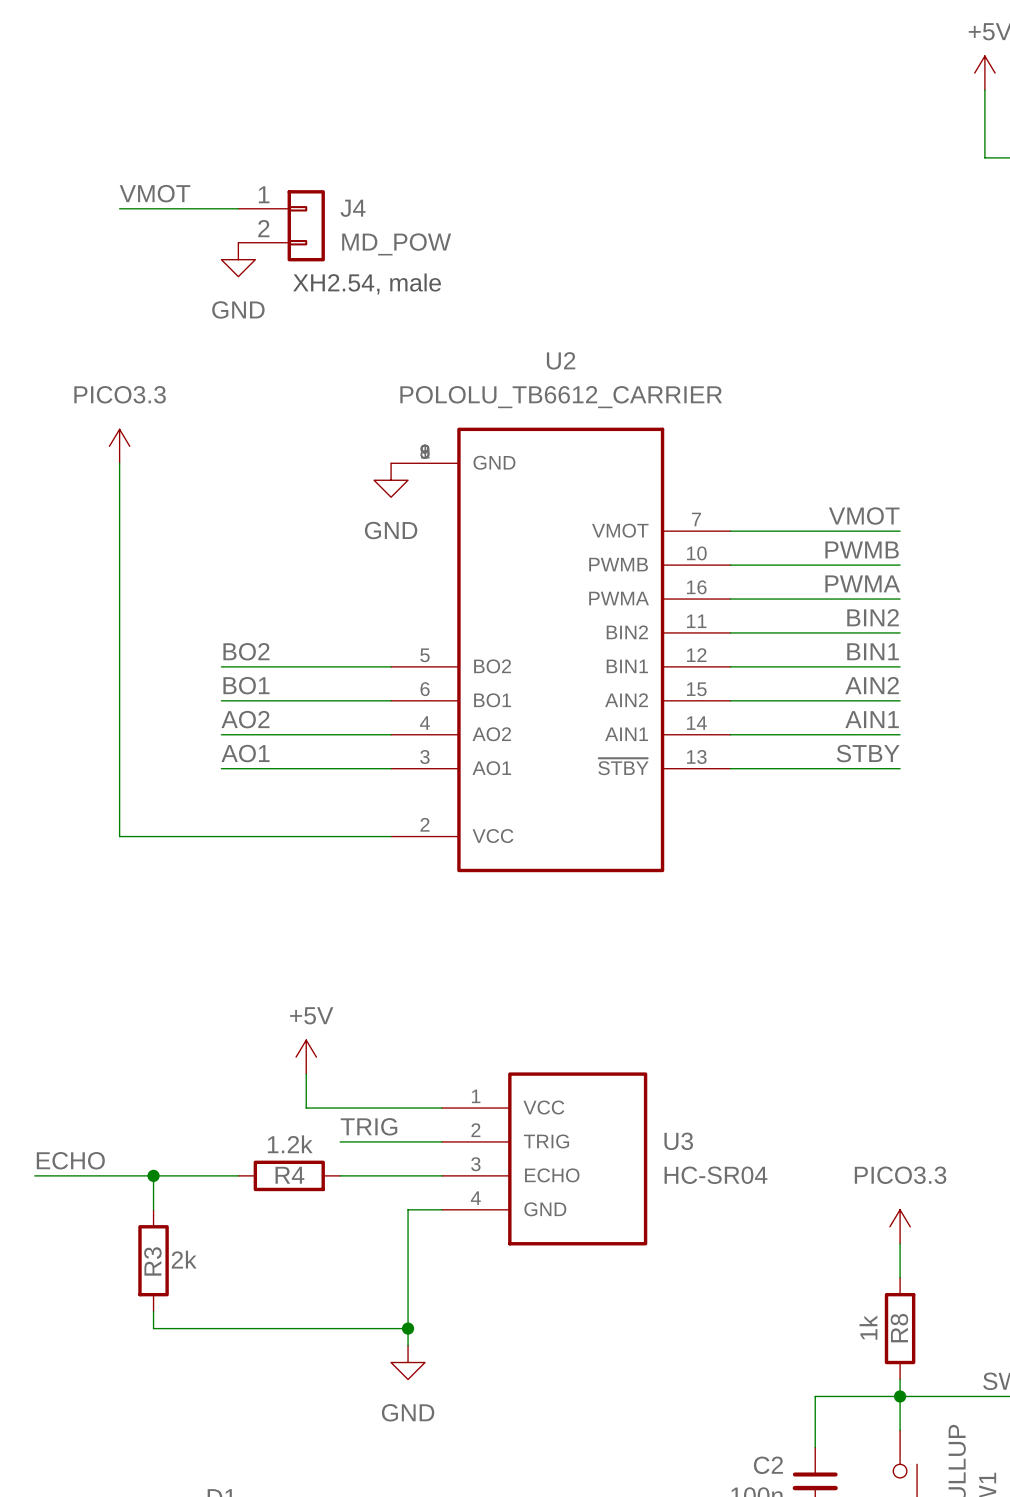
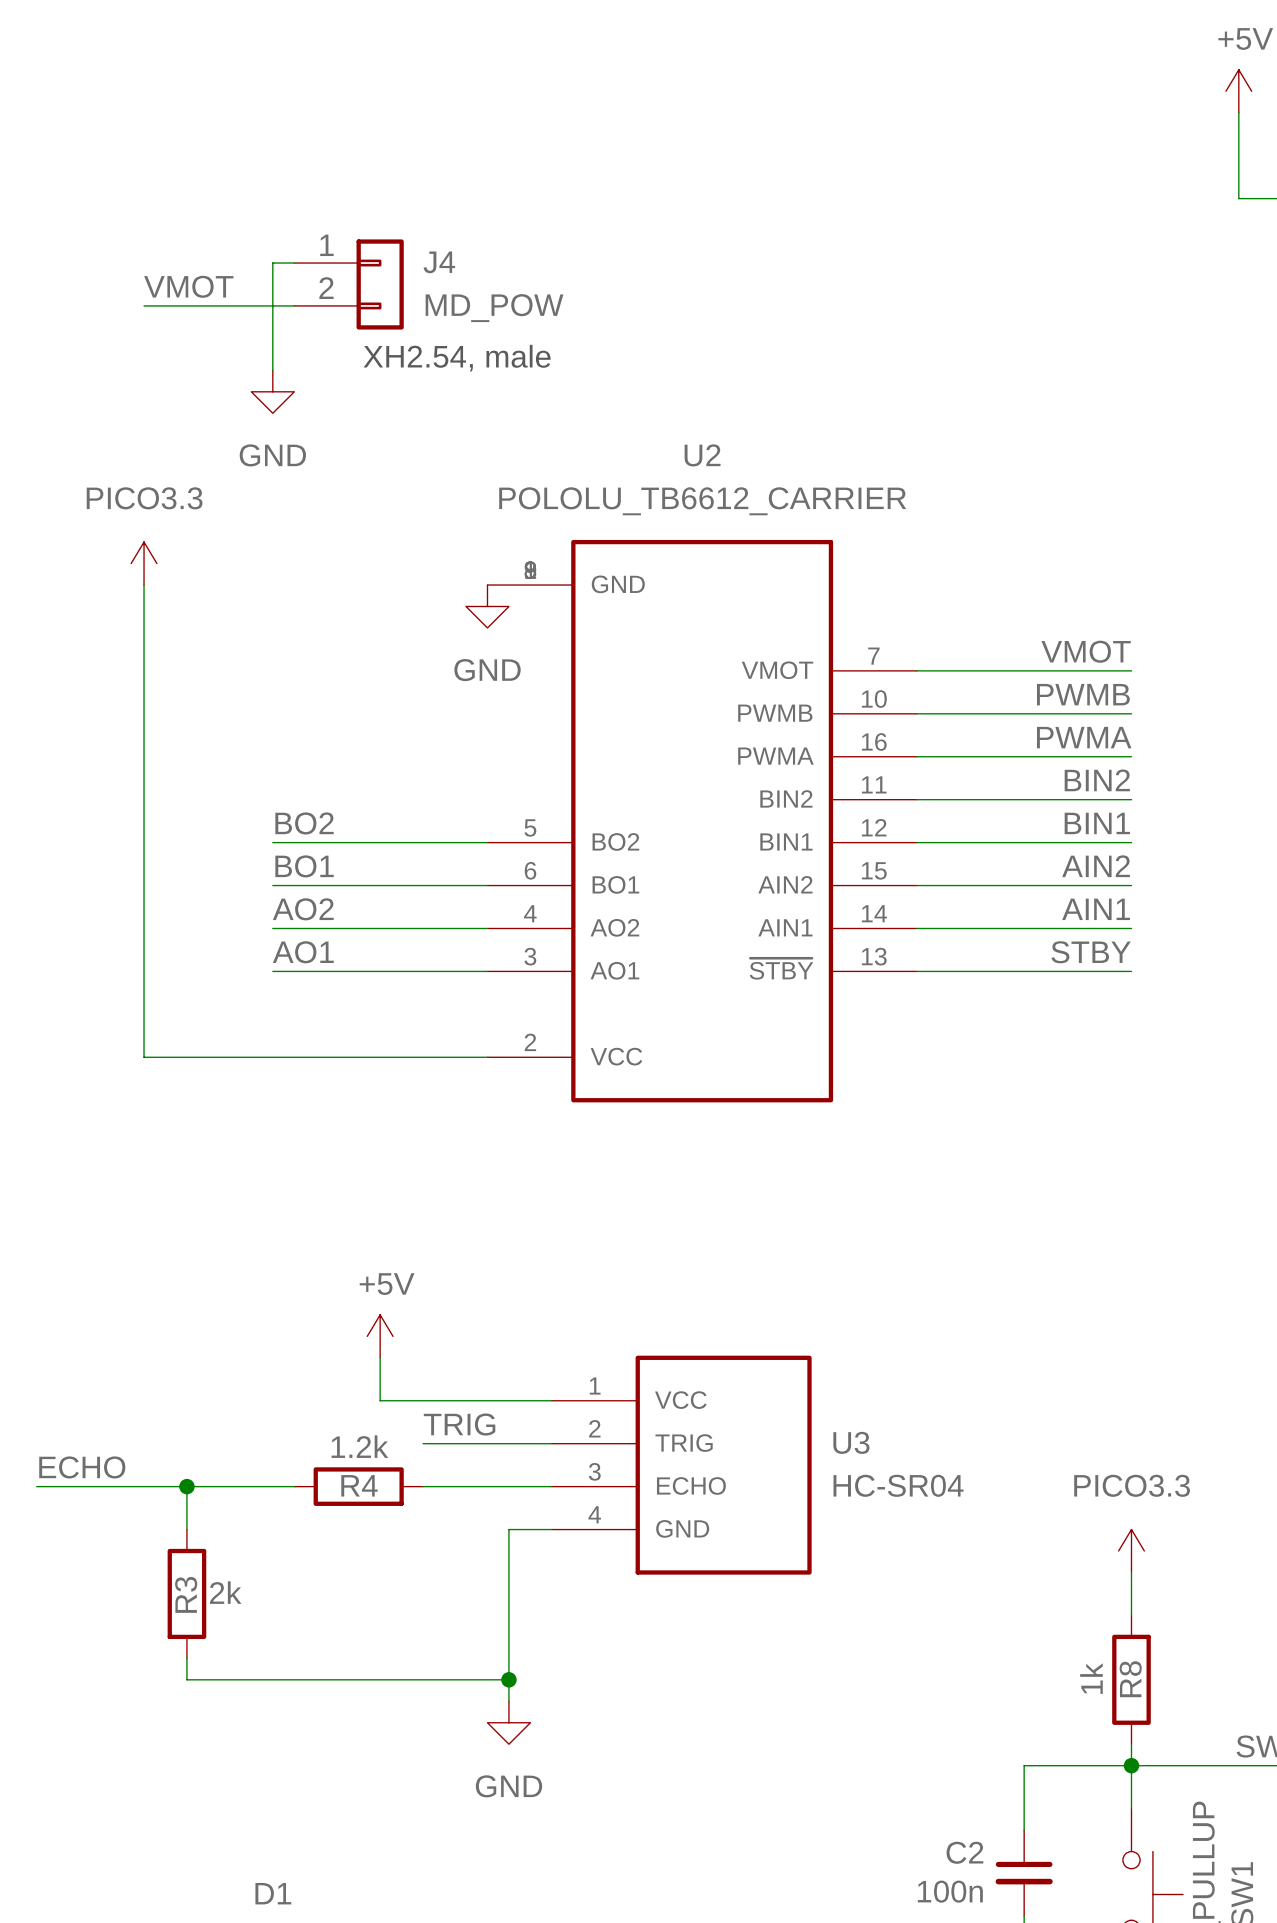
label position: VMOT (155, 193) -> VMOT (188, 286)
wire: (119, 208) (221, 208) -> (272, 370) (272, 263)
wire: none -> (144, 305) (294, 305)
power symbol position: GND (238, 259) -> GND (272, 391)

